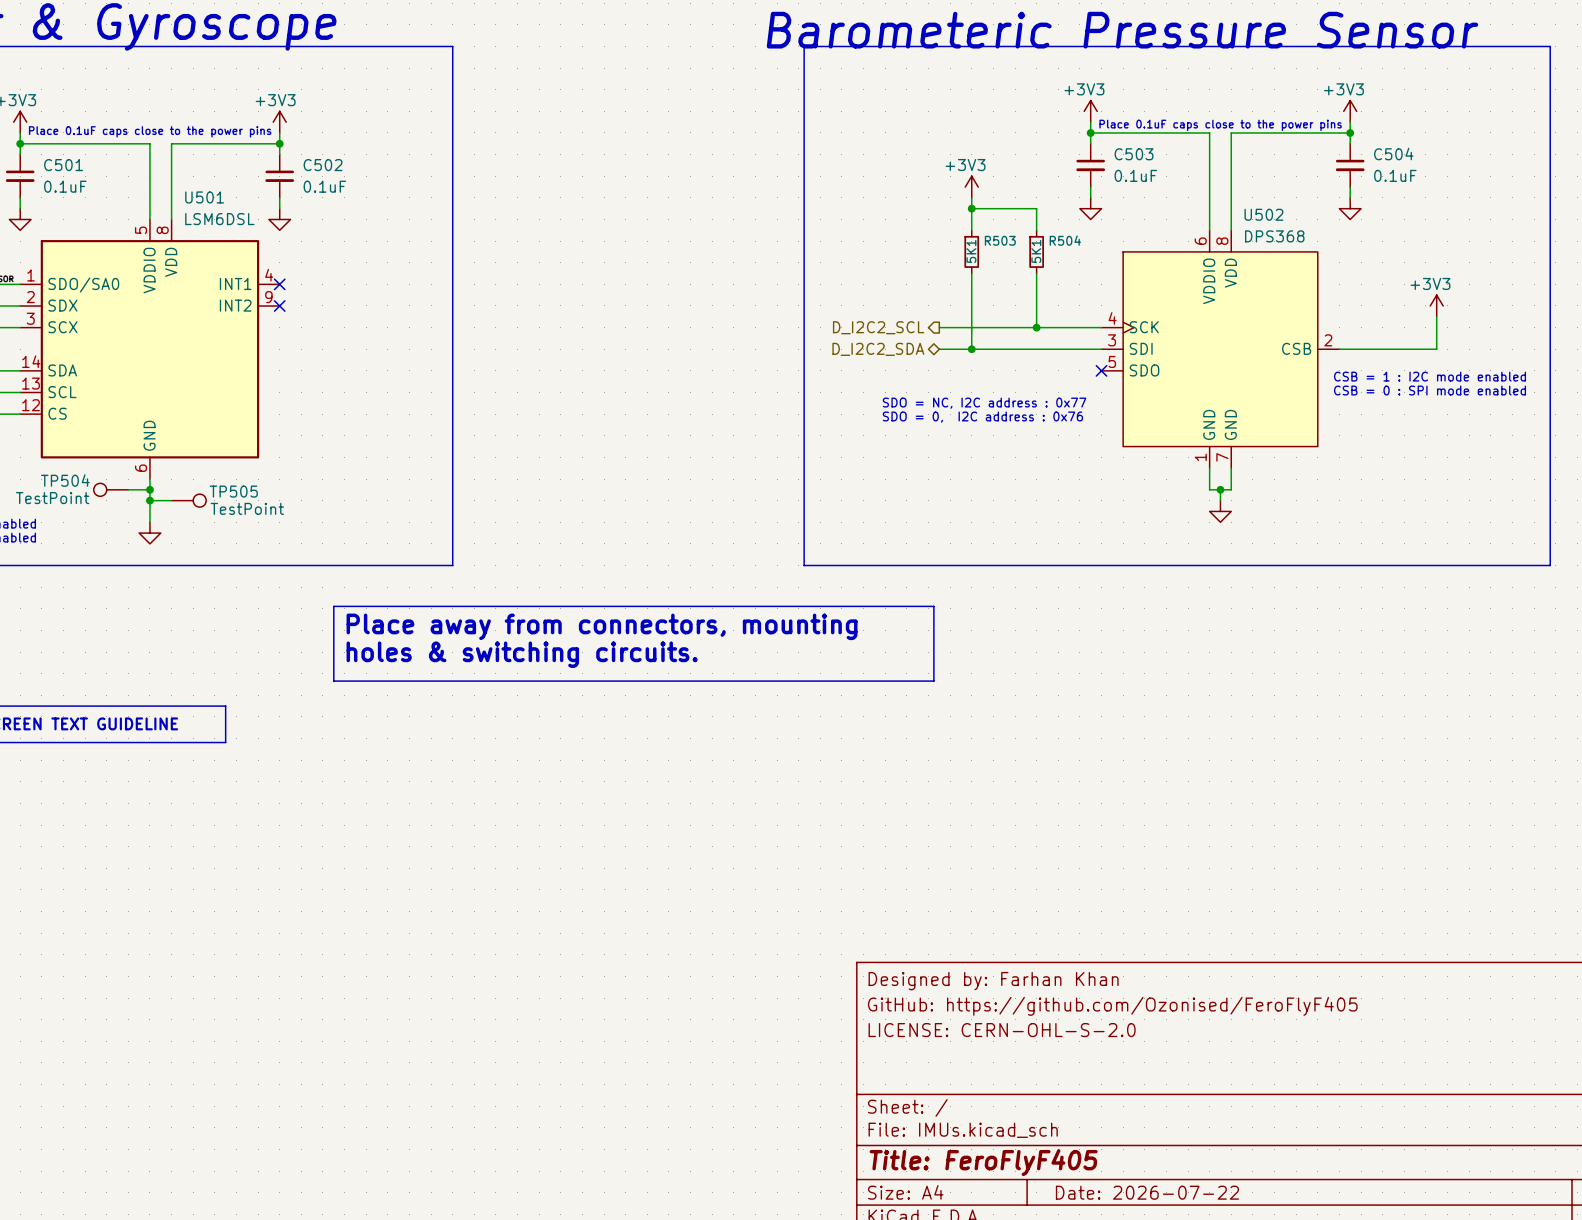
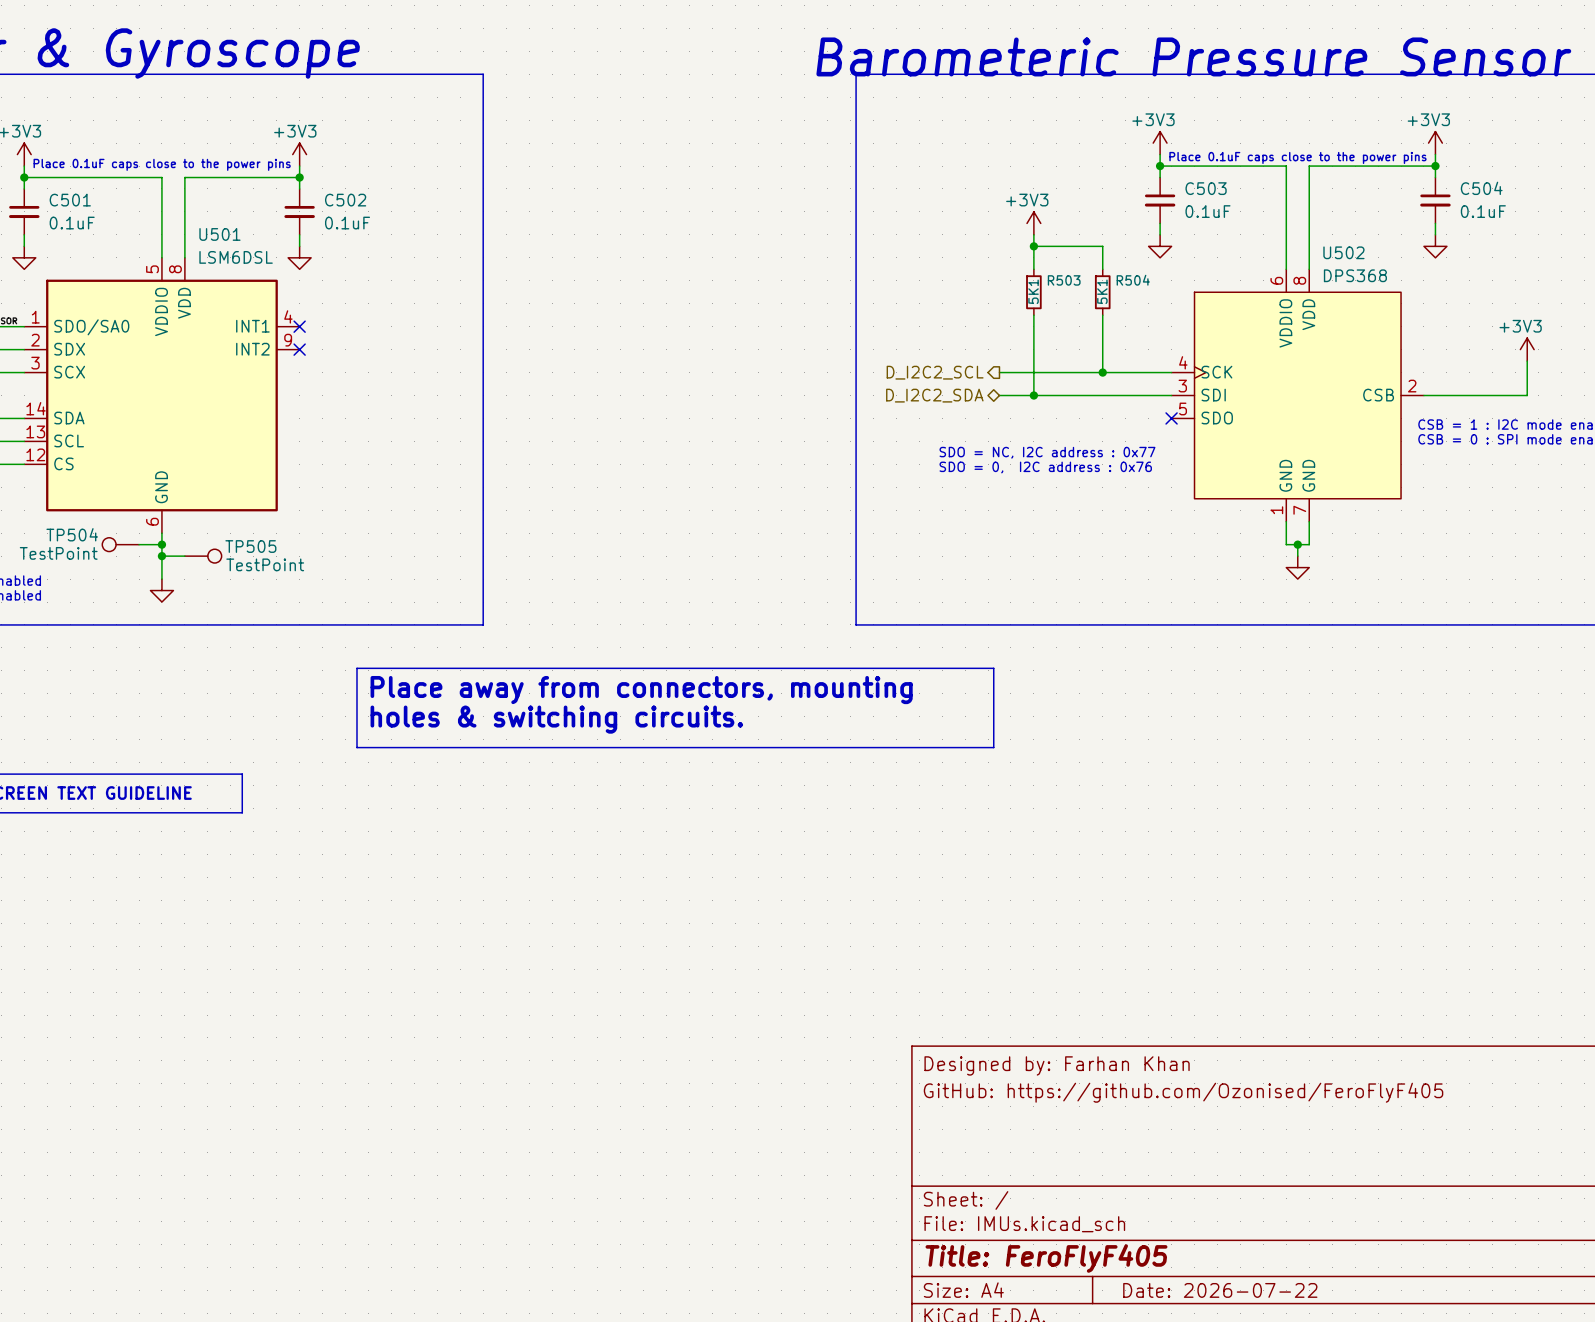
title block: LICENSE: CERN-OHL-S-2.0 (1002, 1030) -> none

